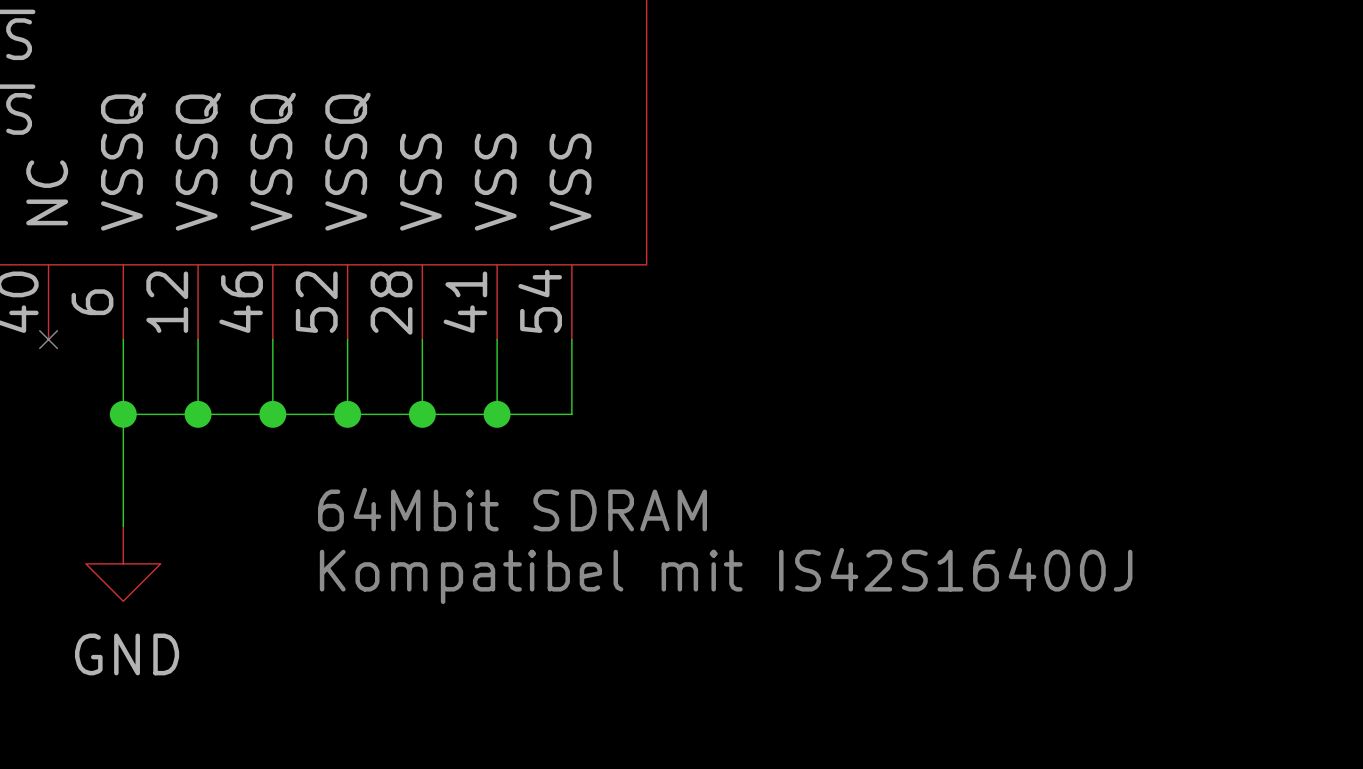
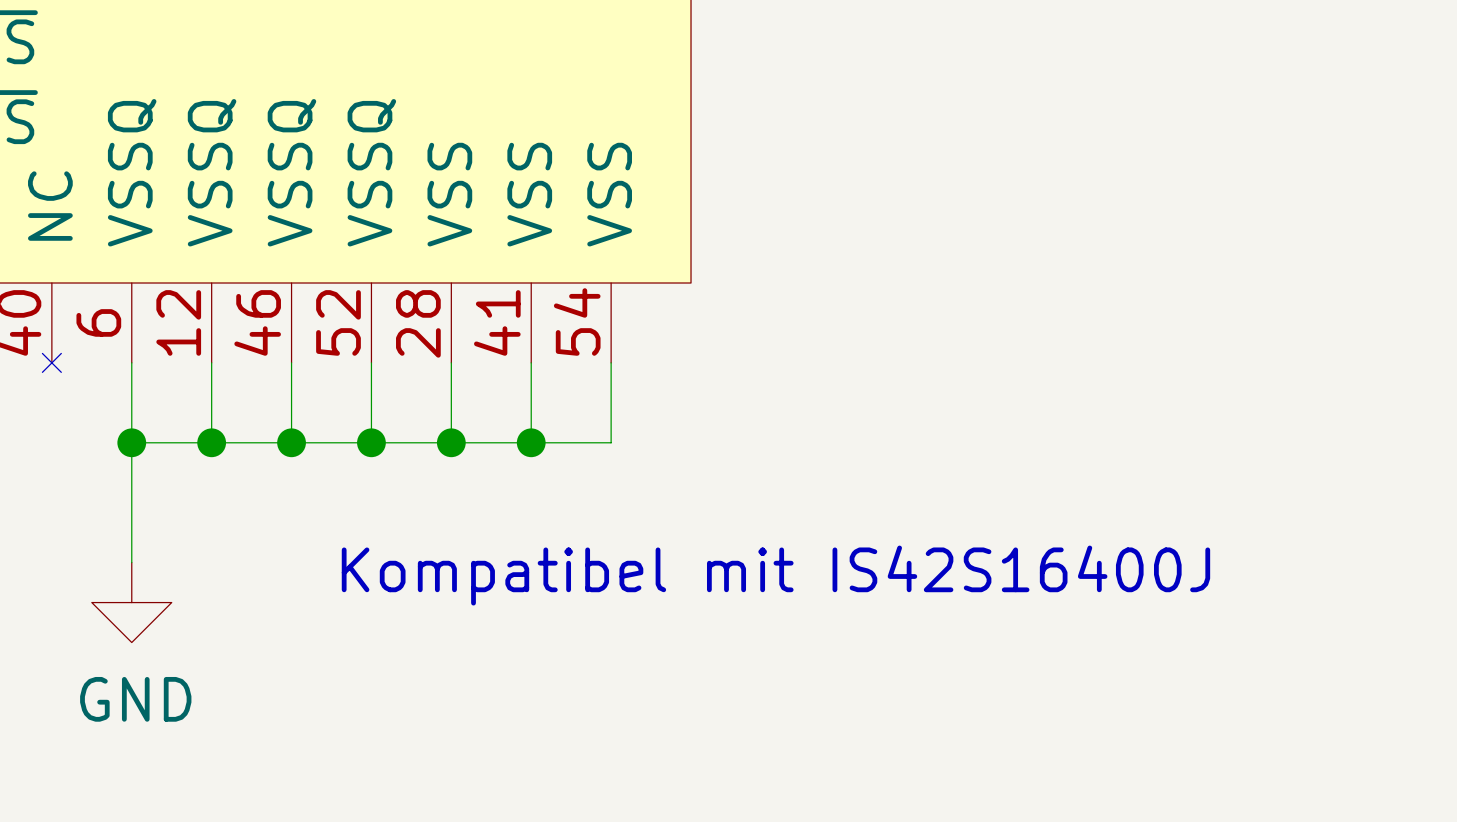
text: 64Mbit SDRAM (512, 509) -> none
text position: Kompatibel mit IS42S16400J (726, 575) -> Kompatibel mit IS42S16400J (775, 575)

